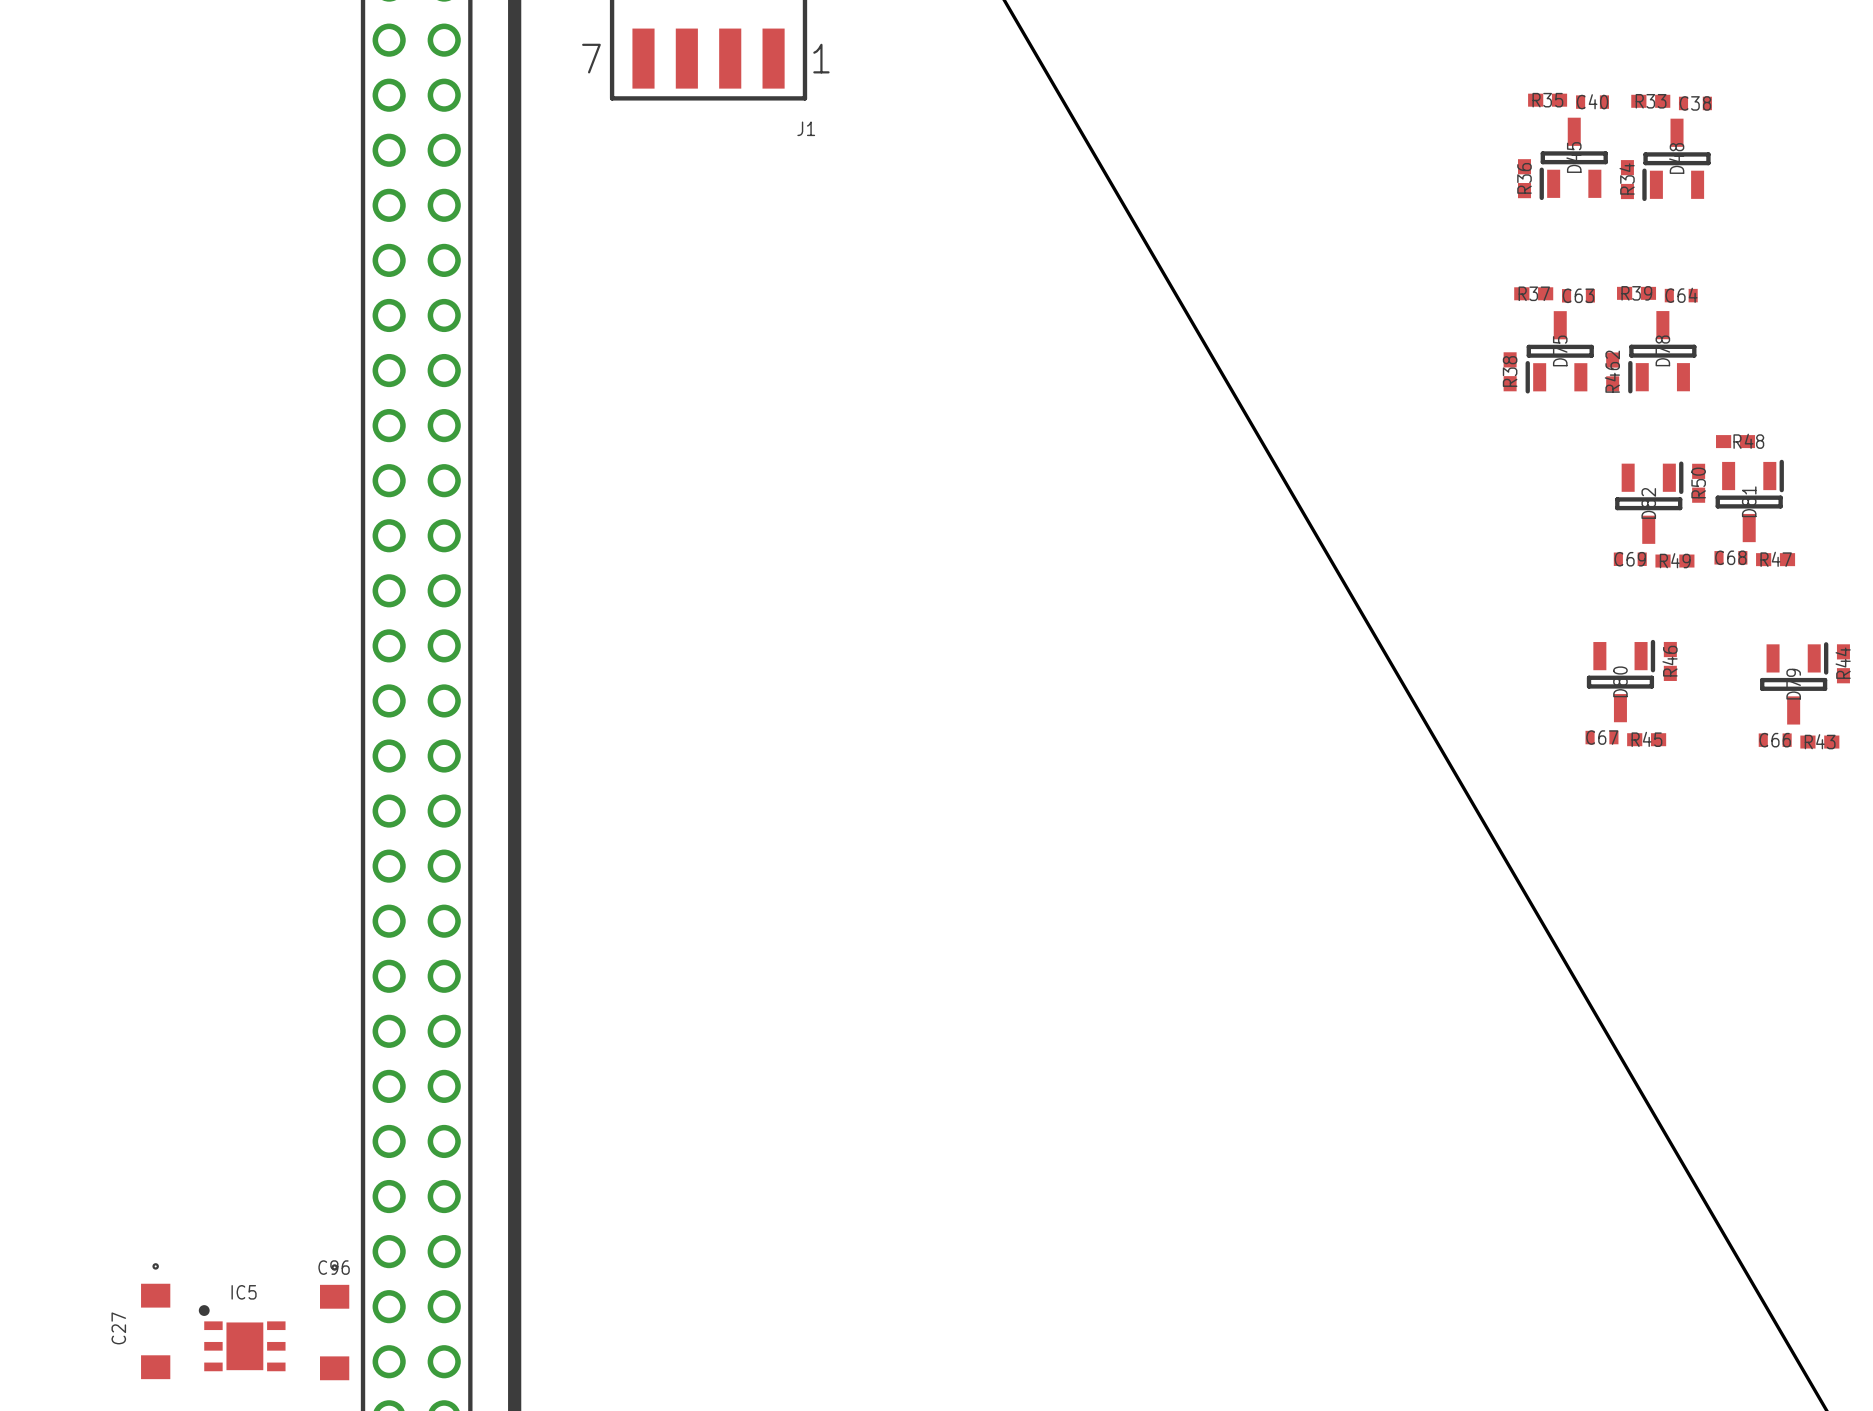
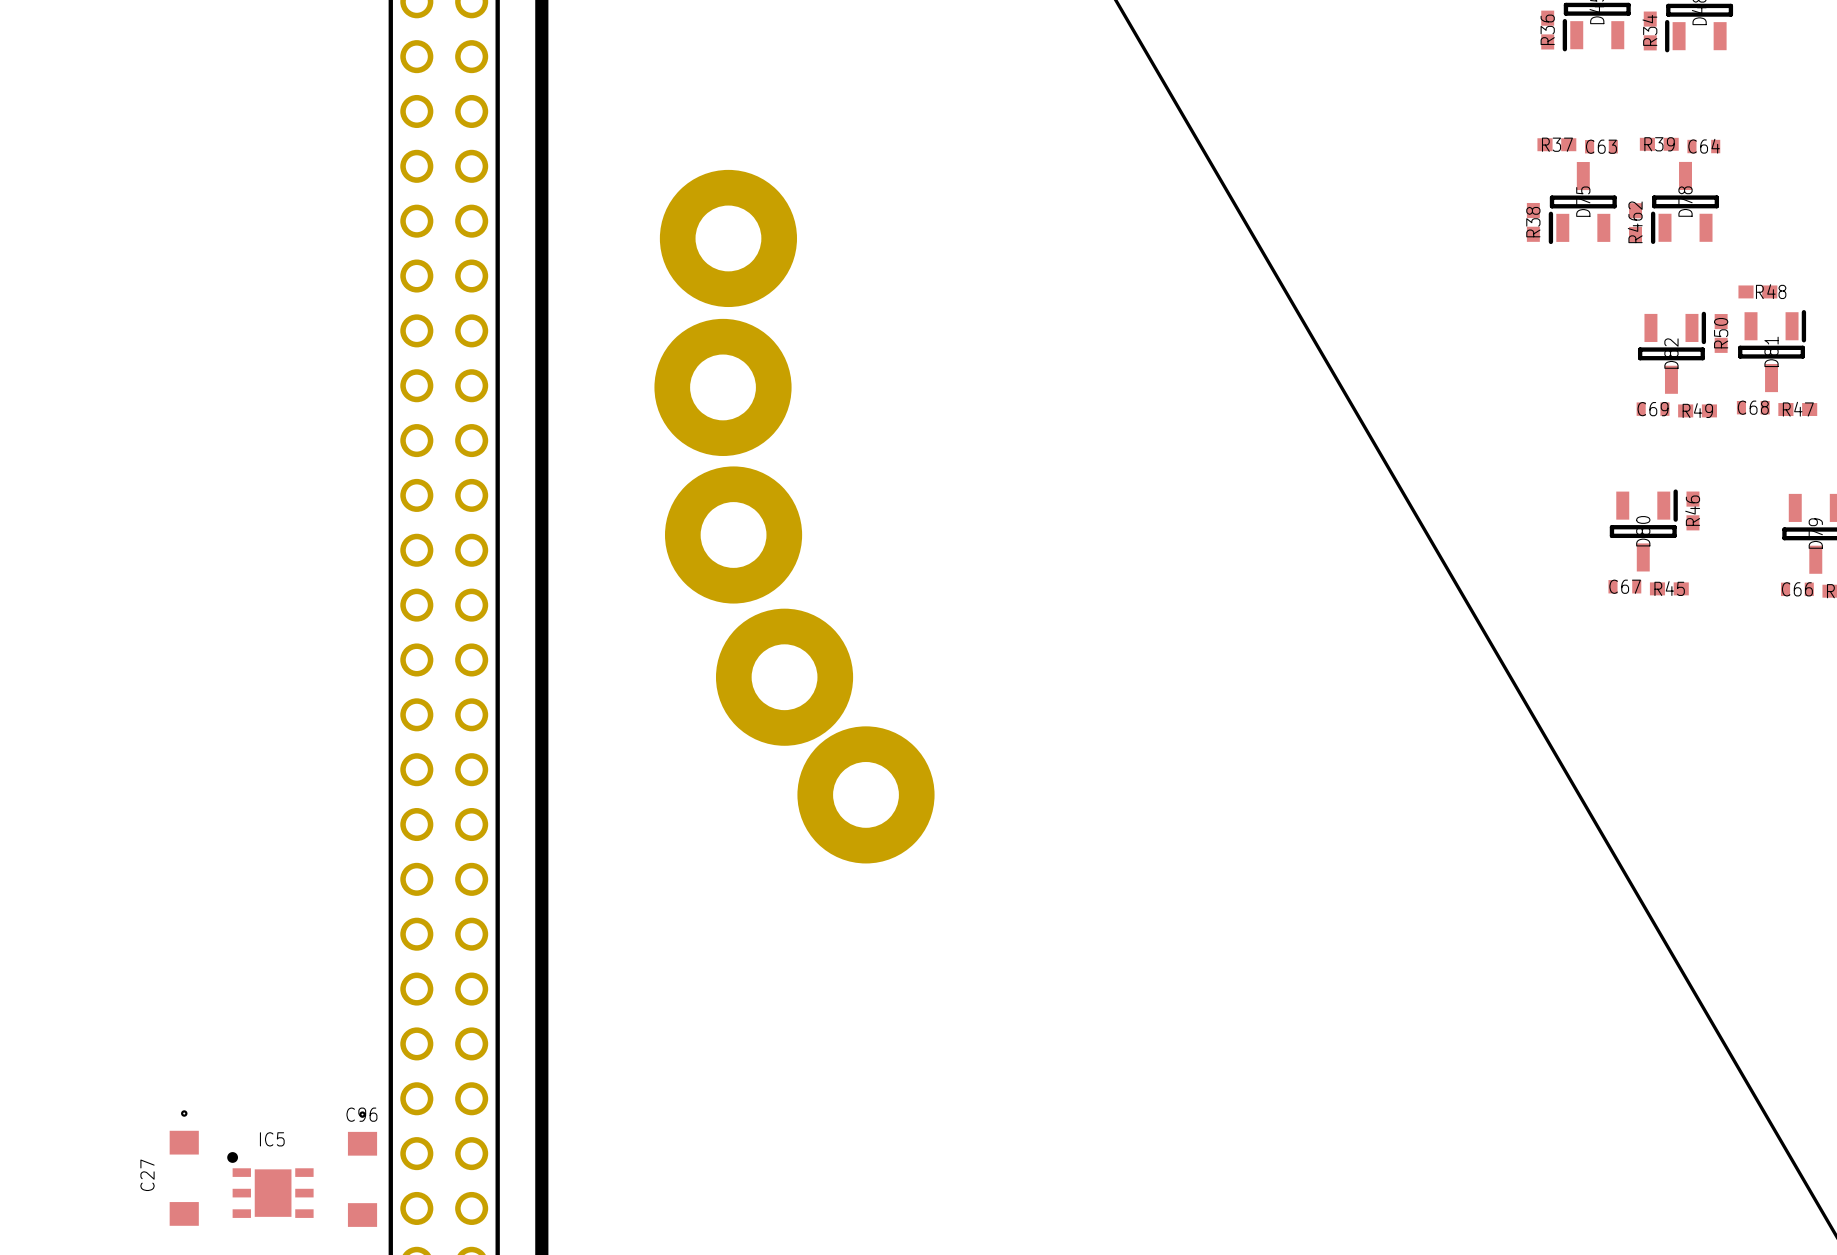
part: none -> (728, 238)
part: none -> (723, 387)
part: none -> (733, 534)
part: none -> (784, 677)
part: none -> (865, 794)

